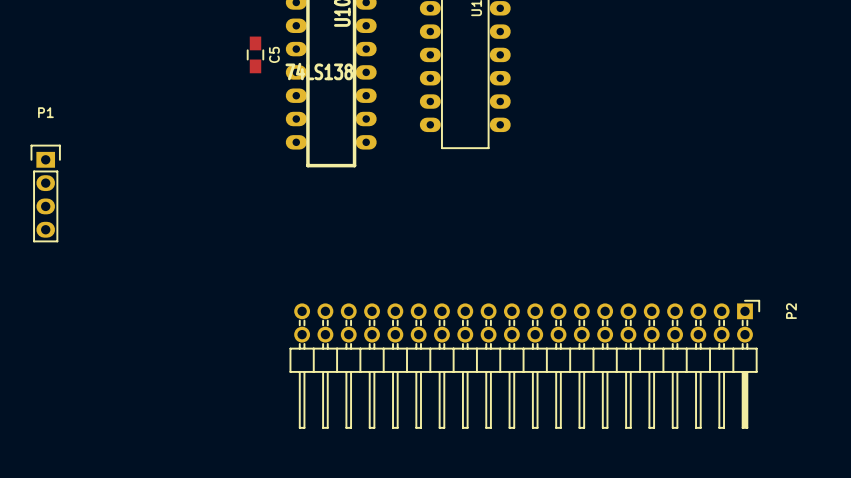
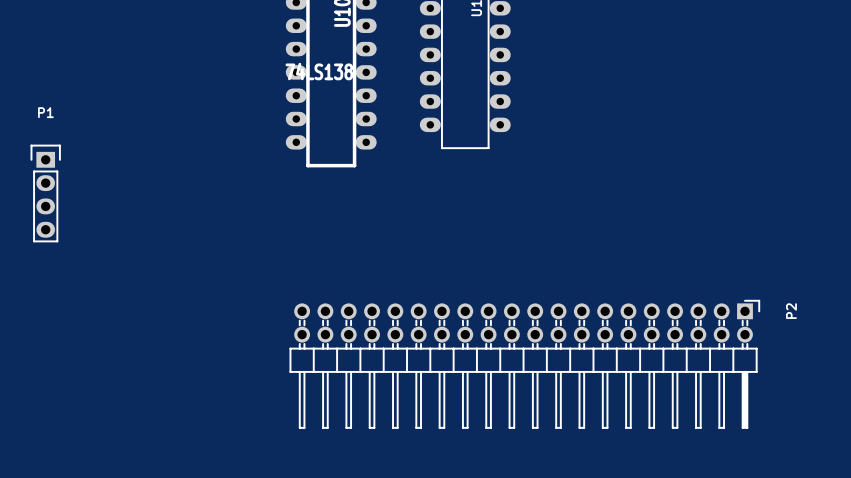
C5: (255, 54) -> none

